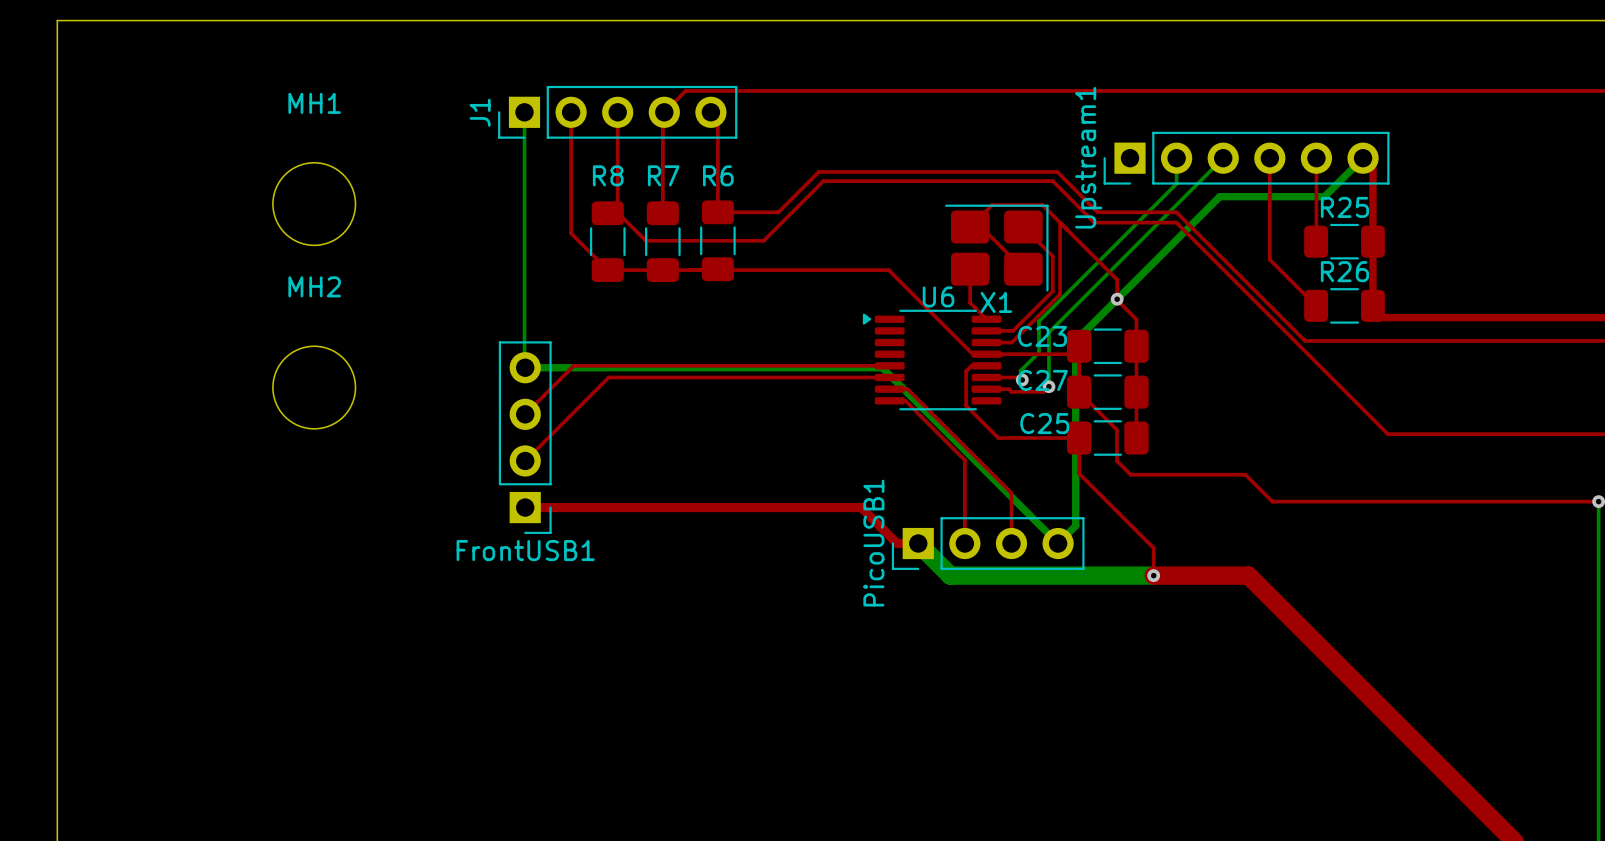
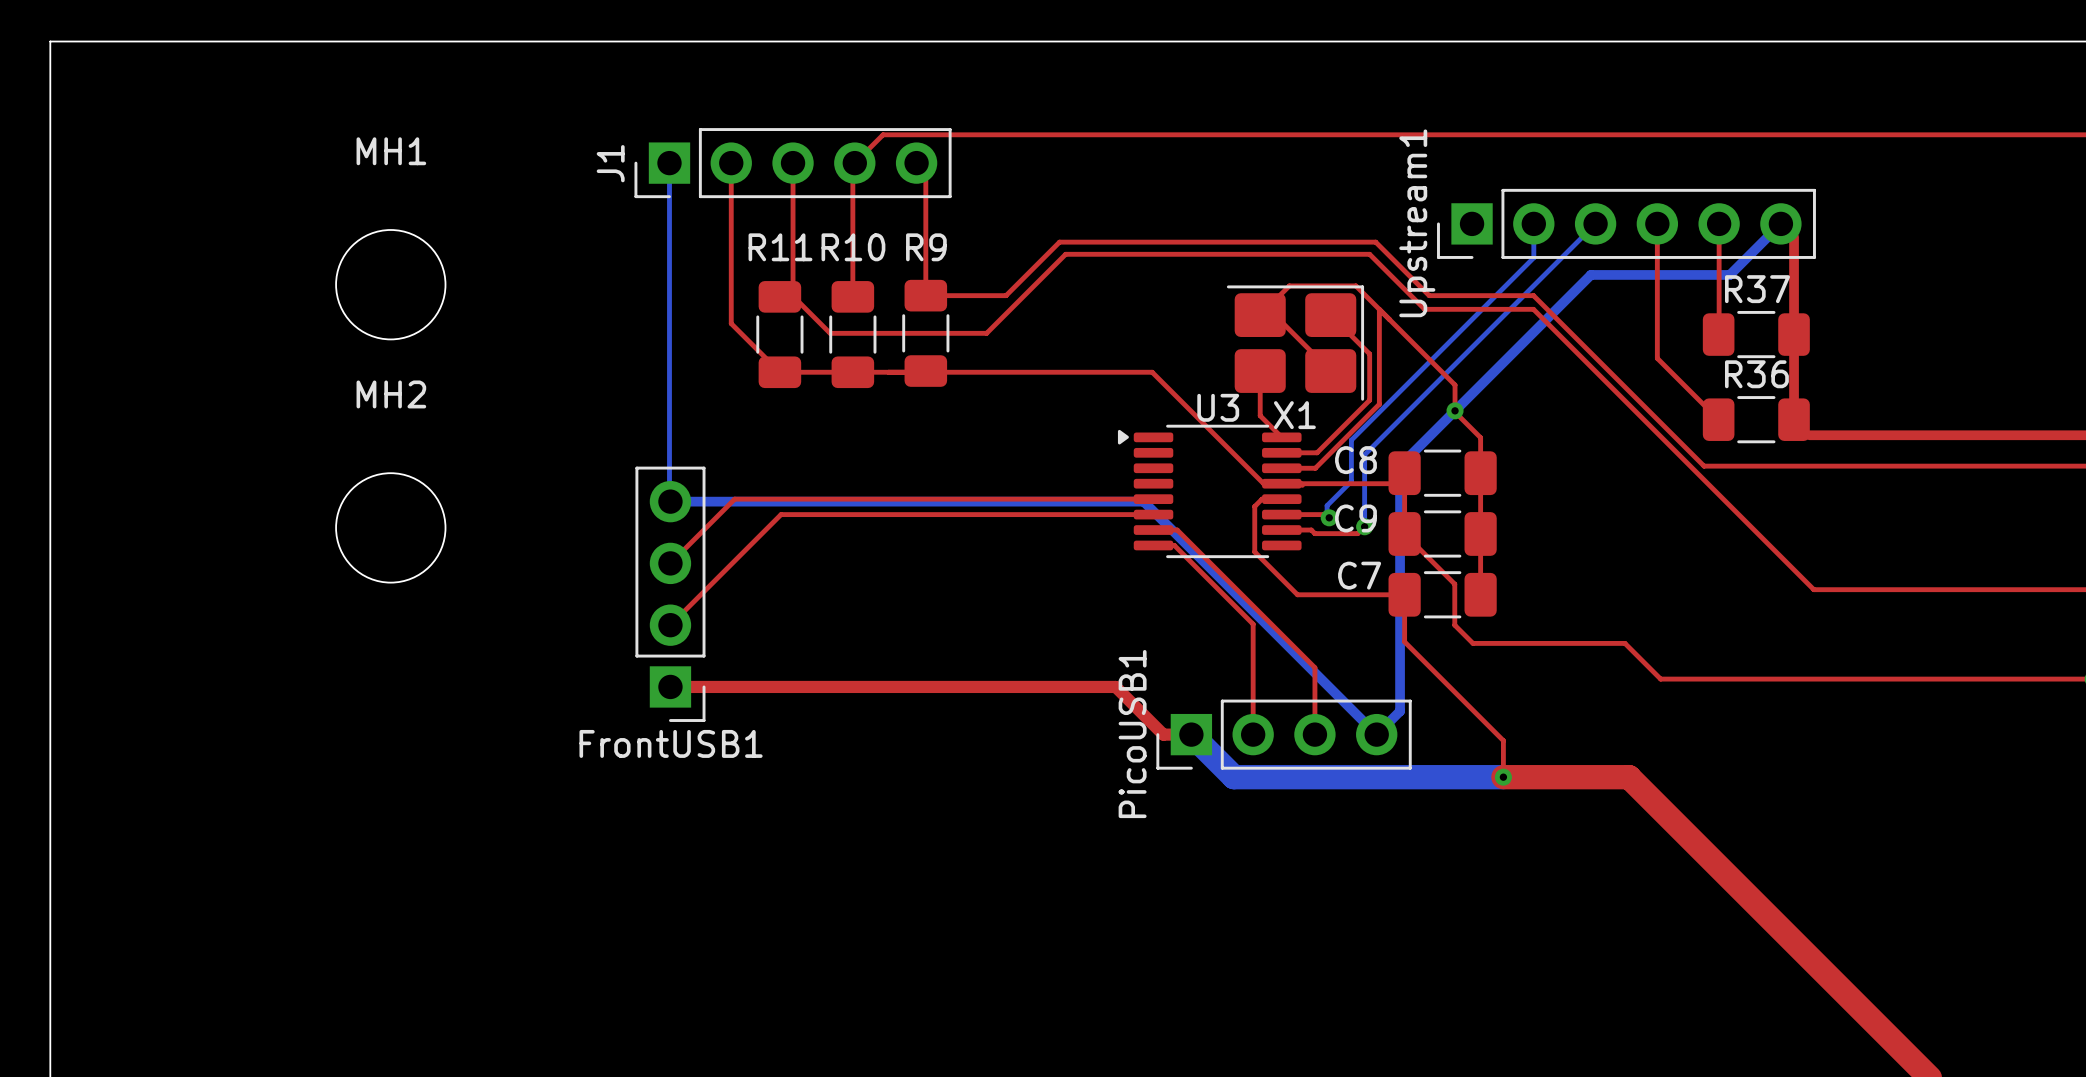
R8 name: R8 (608, 175) -> R11 (780, 247)
R7 name: R7 (663, 175) -> R10 (853, 247)
R6 name: R6 (718, 175) -> R9 (926, 247)
R25 name: R25 (1344, 207) -> R37 (1757, 289)
R26 name: R26 (1344, 271) -> R36 (1756, 374)
U6 name: U6 (938, 296) -> U3 (1218, 407)
C23 name: C23 (1042, 336) -> C8 (1355, 460)
C27 name: C27 (1042, 380) -> C9 (1355, 518)
C25 name: C25 (1044, 423) -> C7 (1359, 575)

